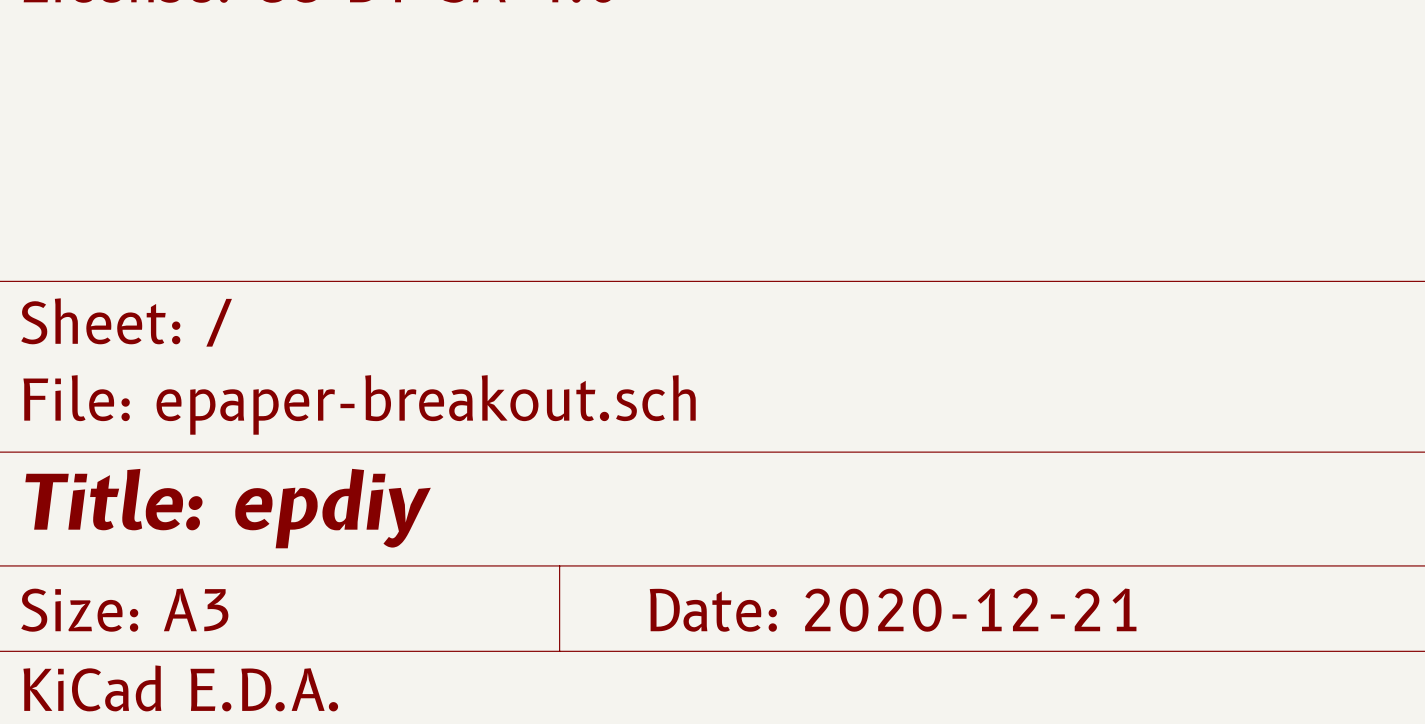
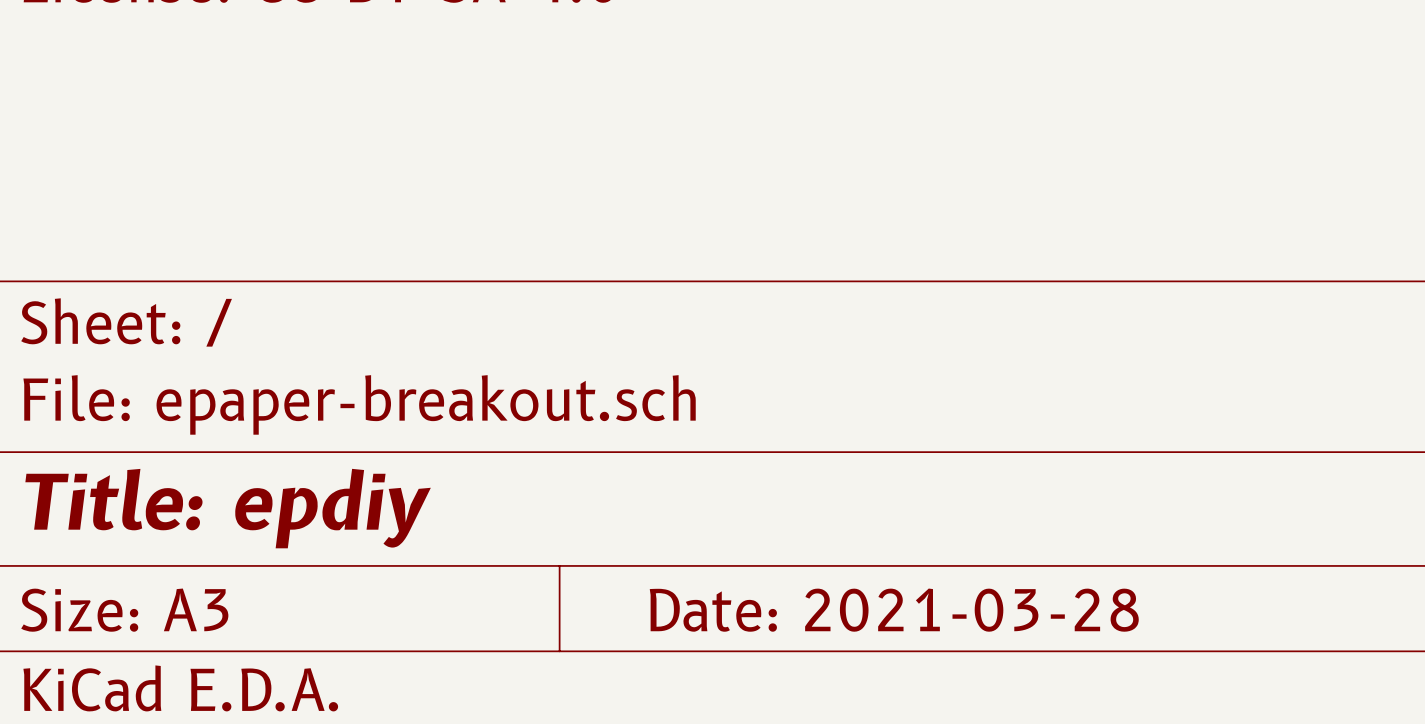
title block: Date: 2020-12-21 (893, 610) -> Date: 2021-03-28 (894, 610)

